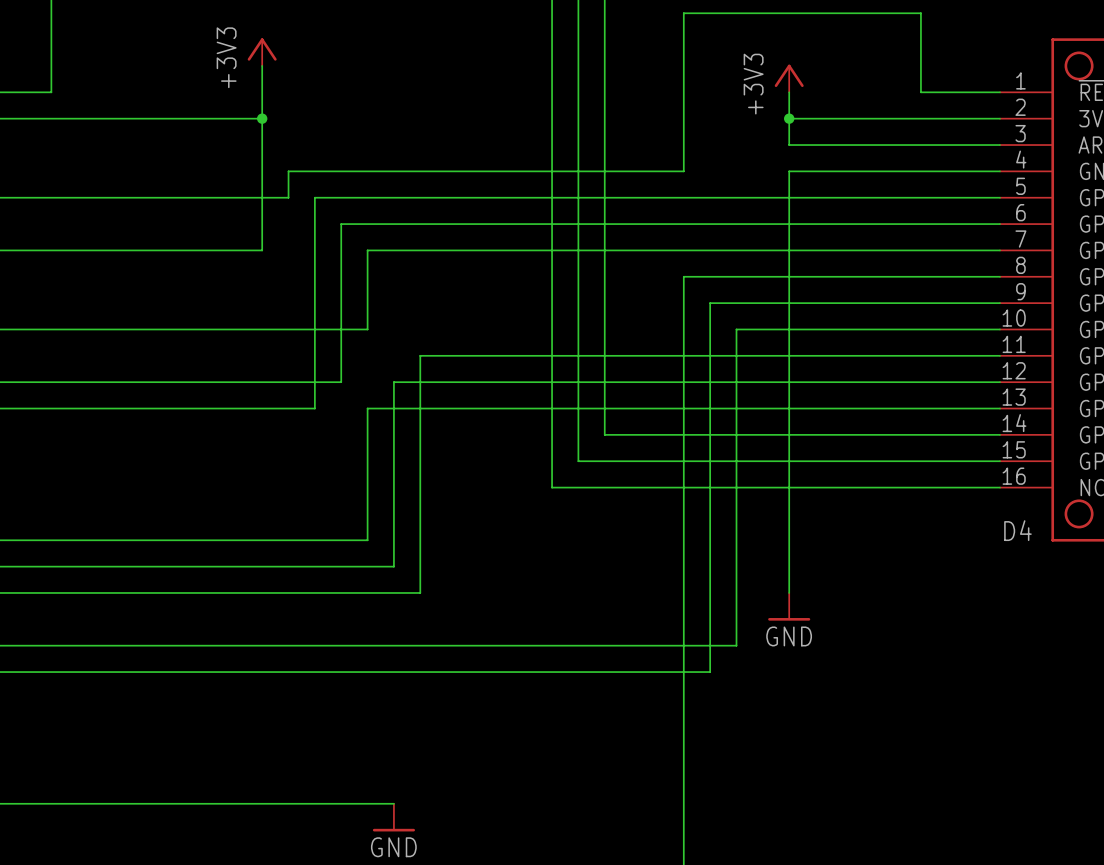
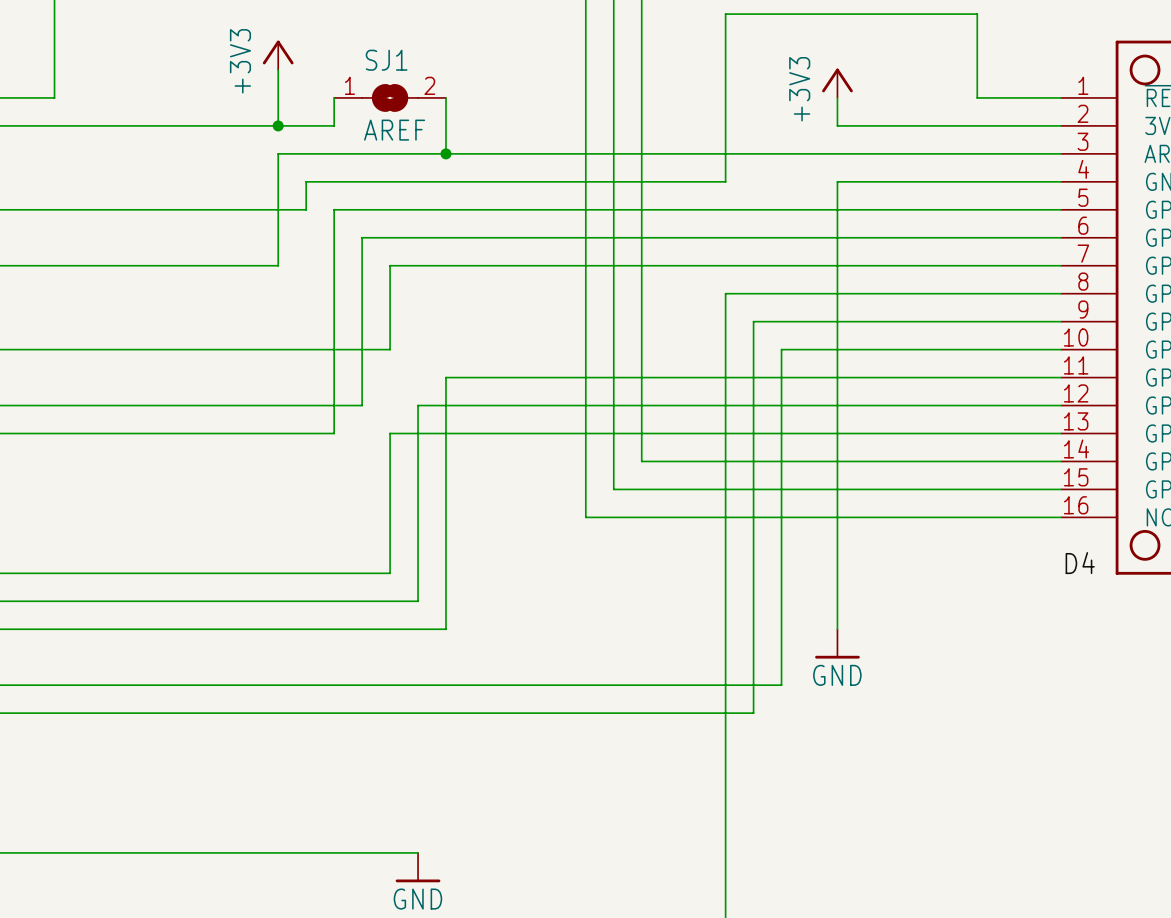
SJ1: none -> AREF (390, 97)
wire: none -> (445, 97) (445, 153)
wire: (262, 118) (262, 145) -> (278, 125) (334, 125) (334, 97)
wire: (789, 118) (789, 145) -> (278, 153) (837, 153)
junction: (789, 118) -> none
junction: none -> (445, 153)

